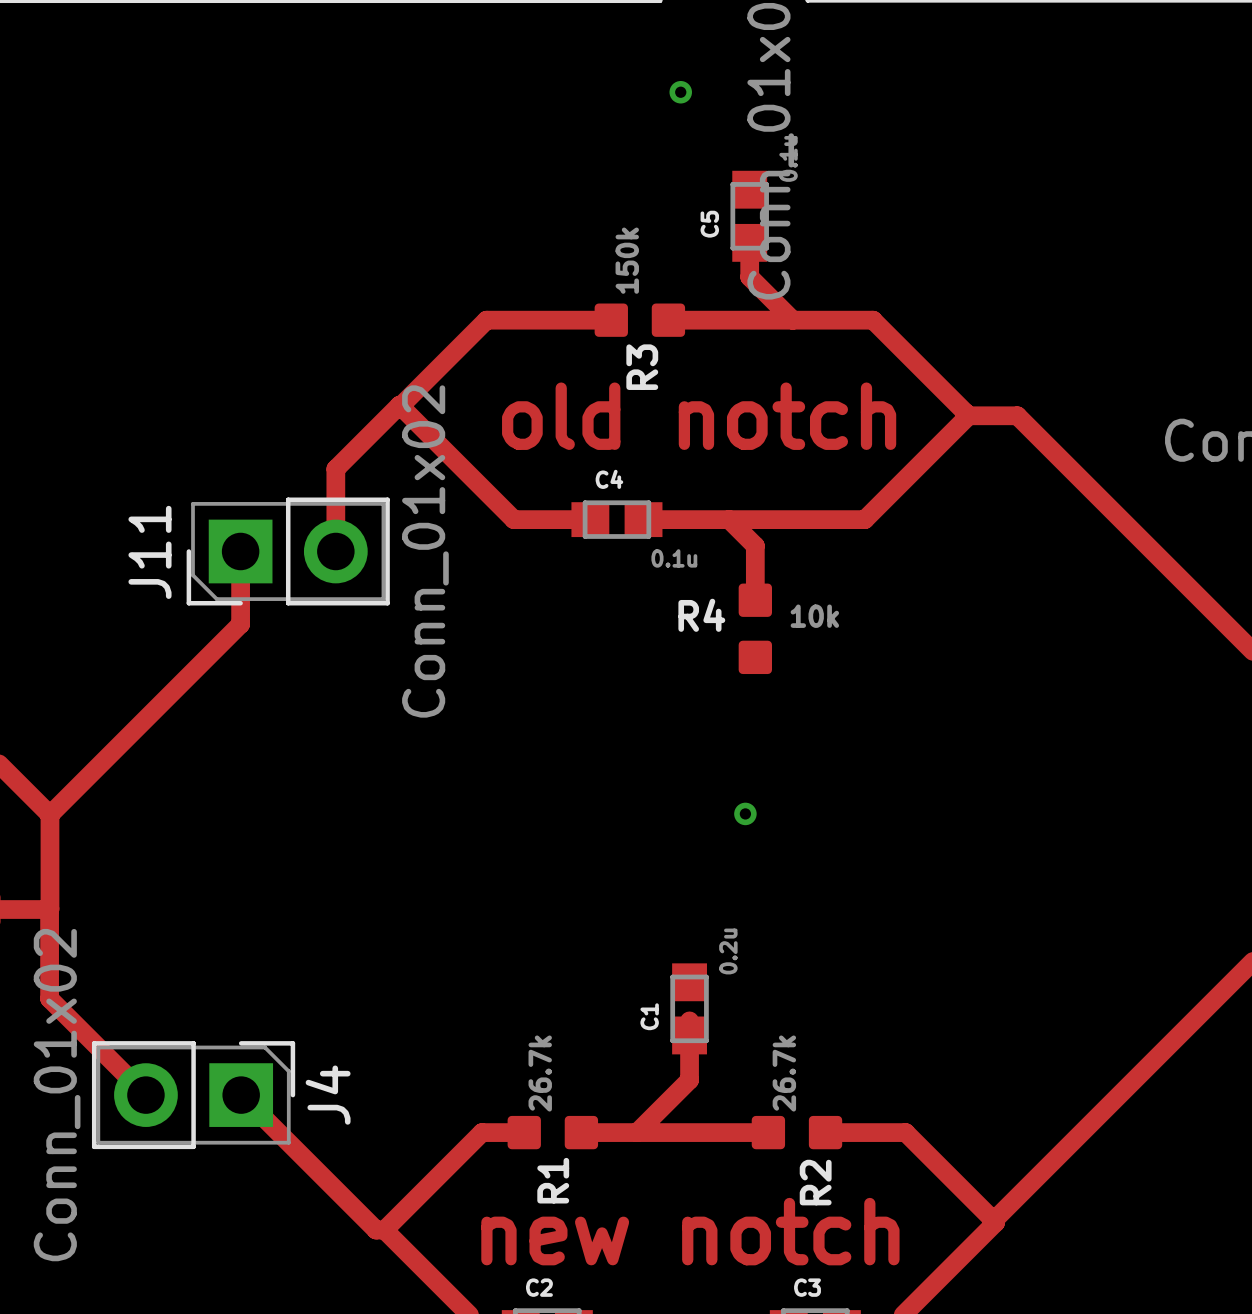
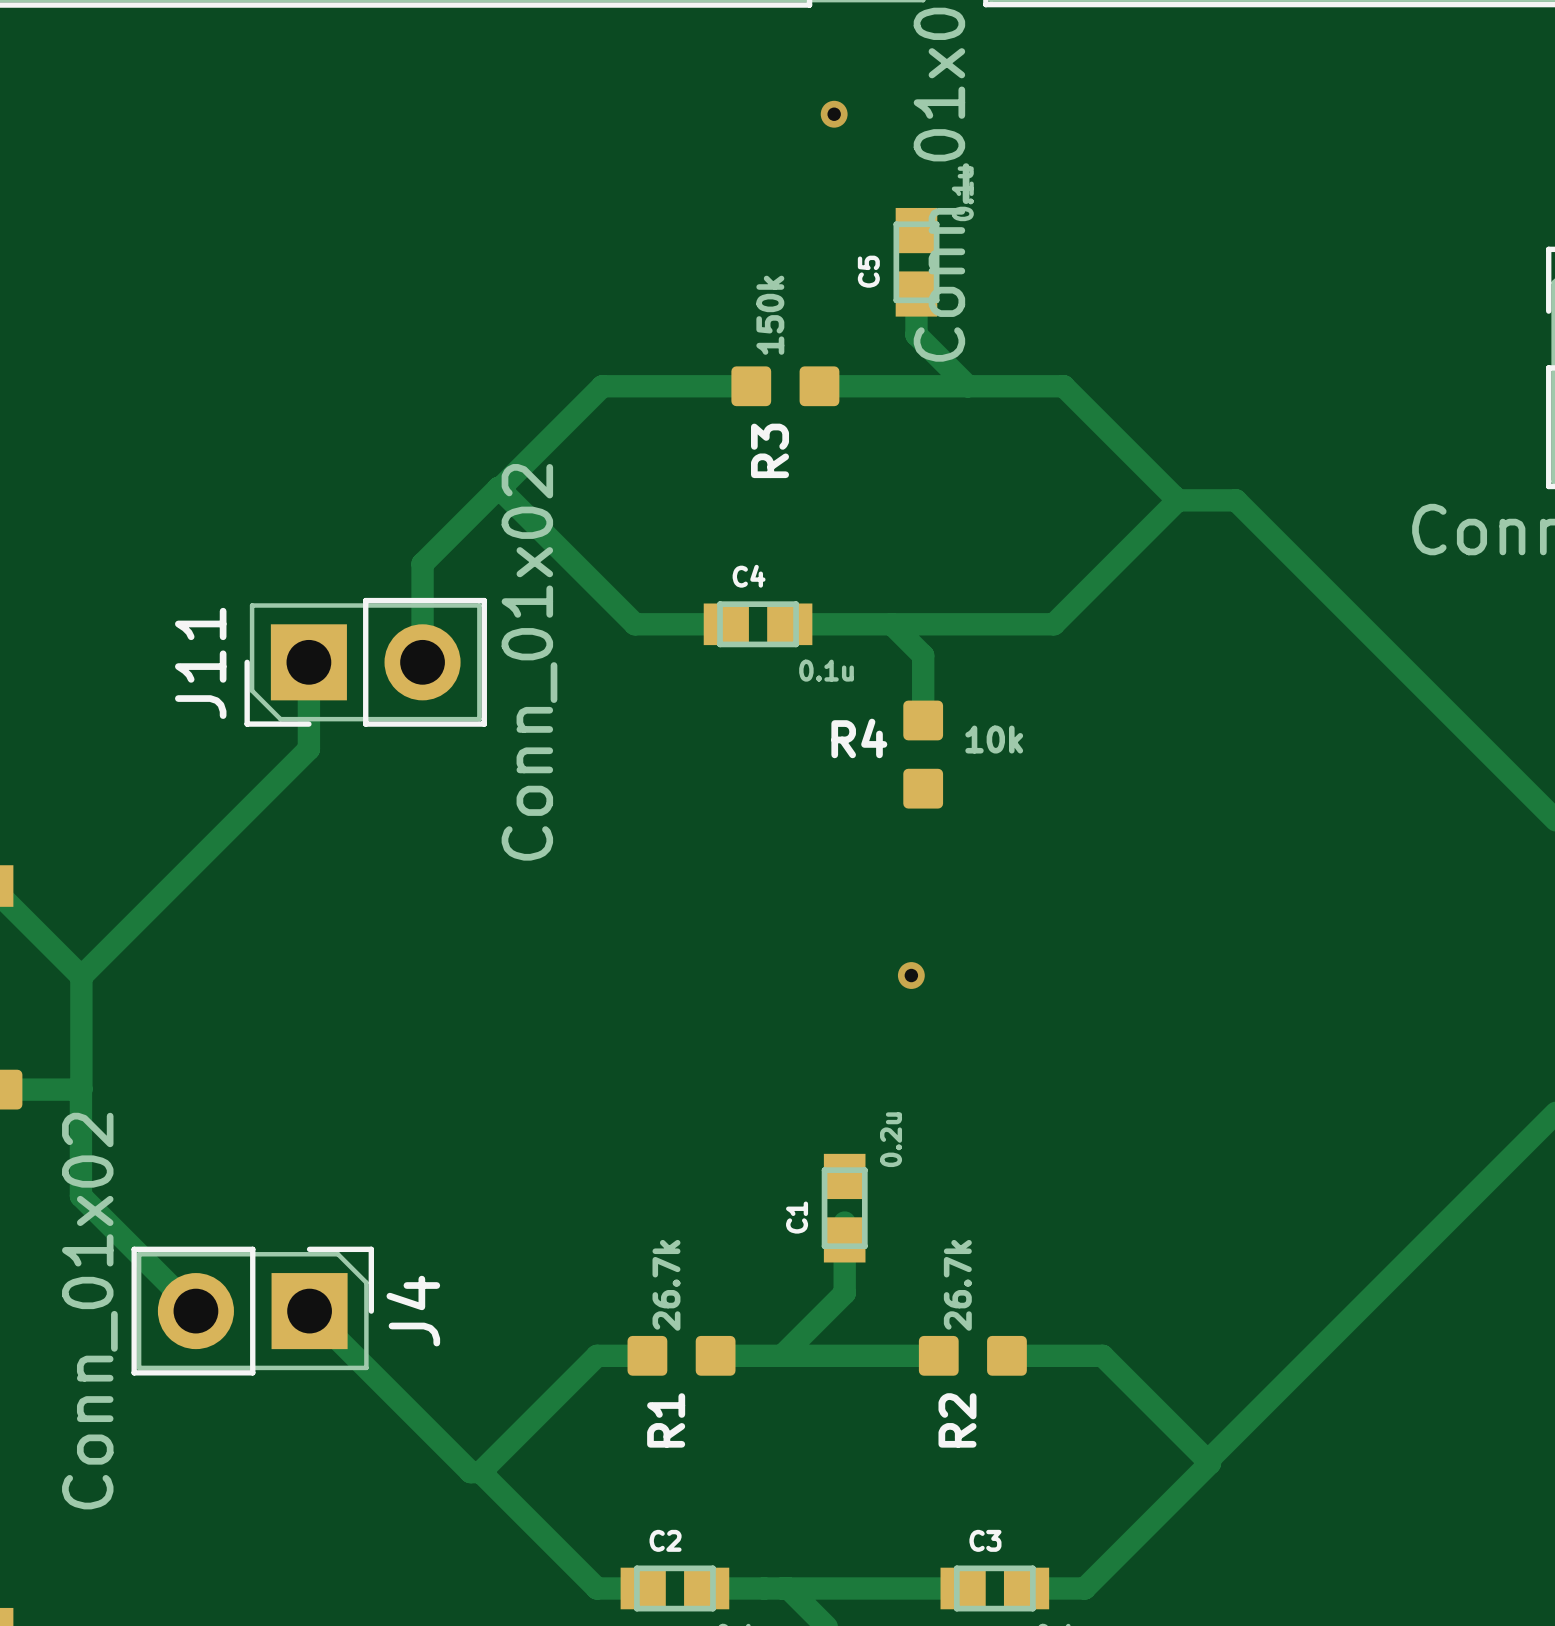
R3 name position: R3 (642, 367) -> R3 (770, 450)
text: old notch (699, 416) -> none
R1 name position: R1 (553, 1180) -> R1 (666, 1420)
R2 name position: R2 (815, 1182) -> R2 (957, 1420)
text: new notch (690, 1231) -> none

